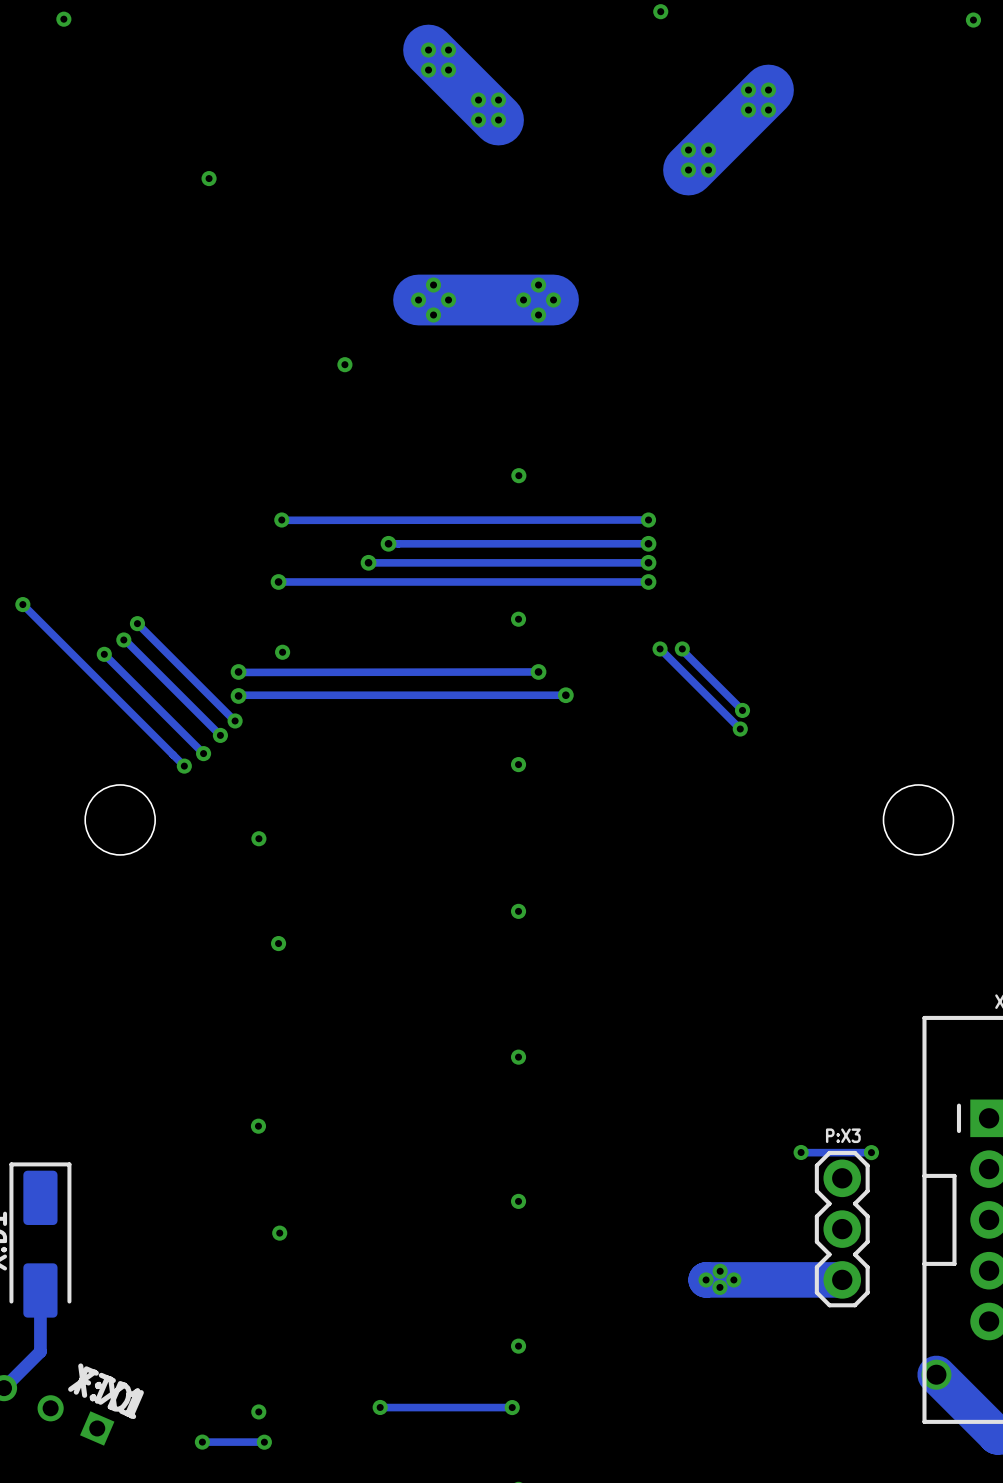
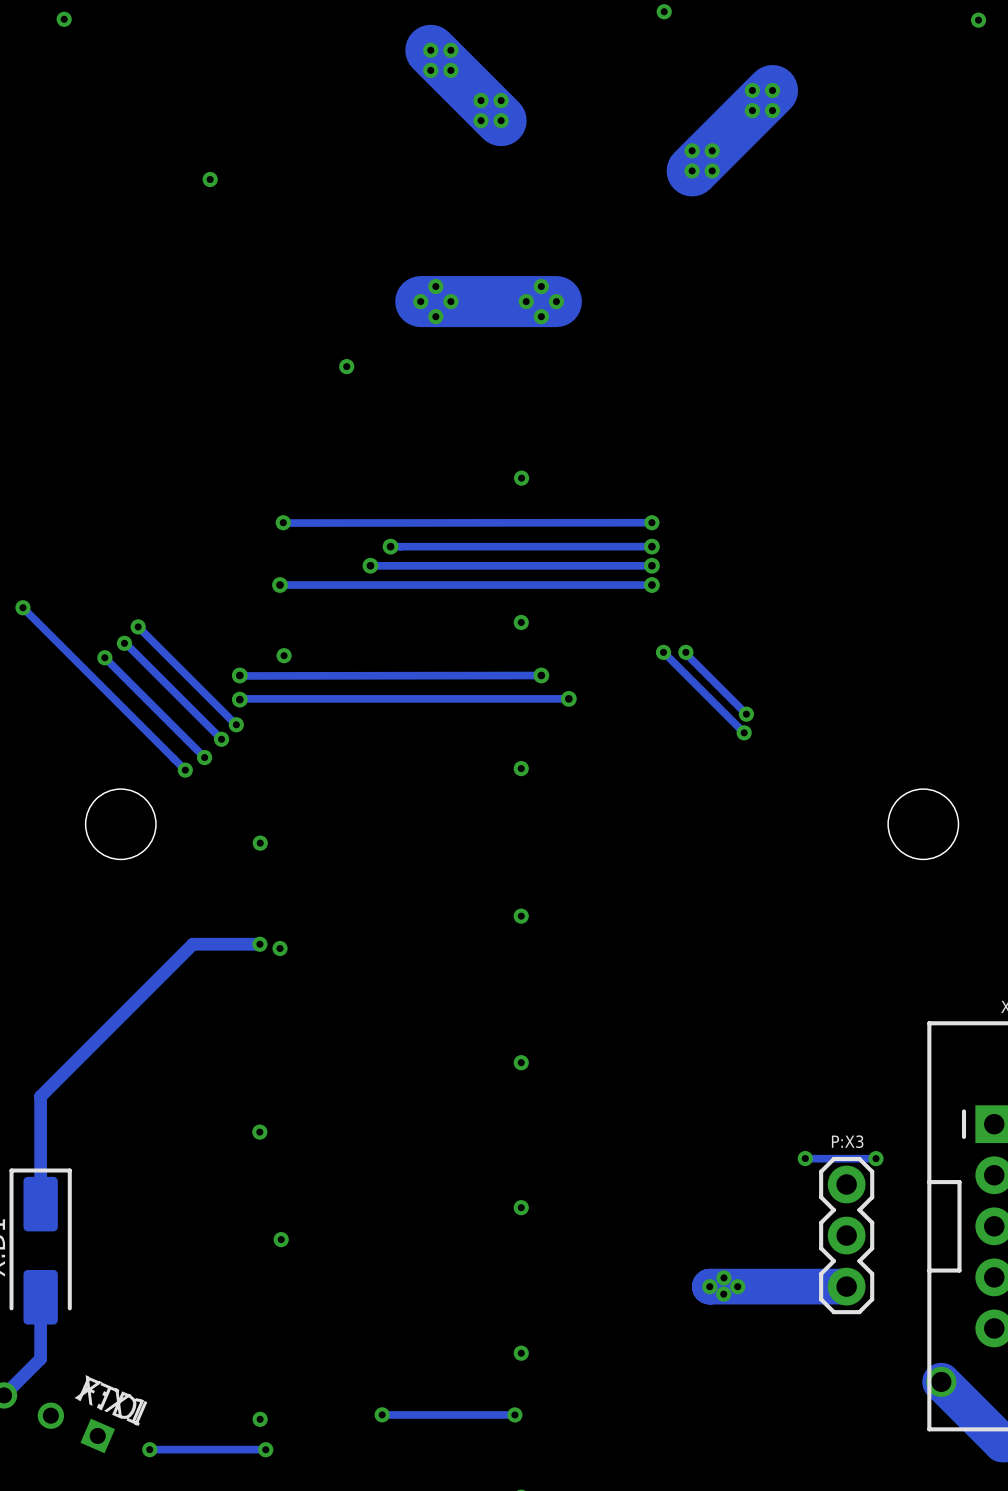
track: none -> (259, 944) (192, 944) (40, 1096) (40, 1204)
via: none -> (259, 944)
track: none -> (203, 1449) (149, 1449)
via position: (202, 1442) -> (149, 1449)

